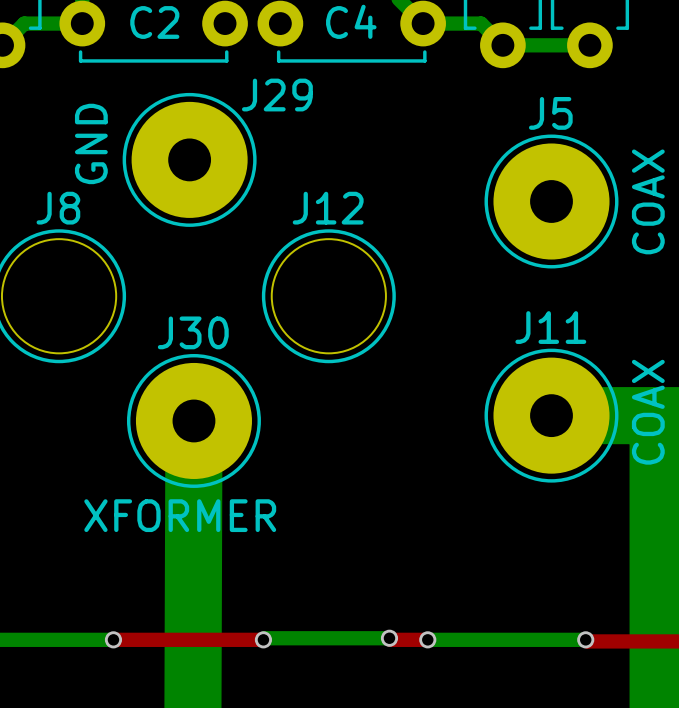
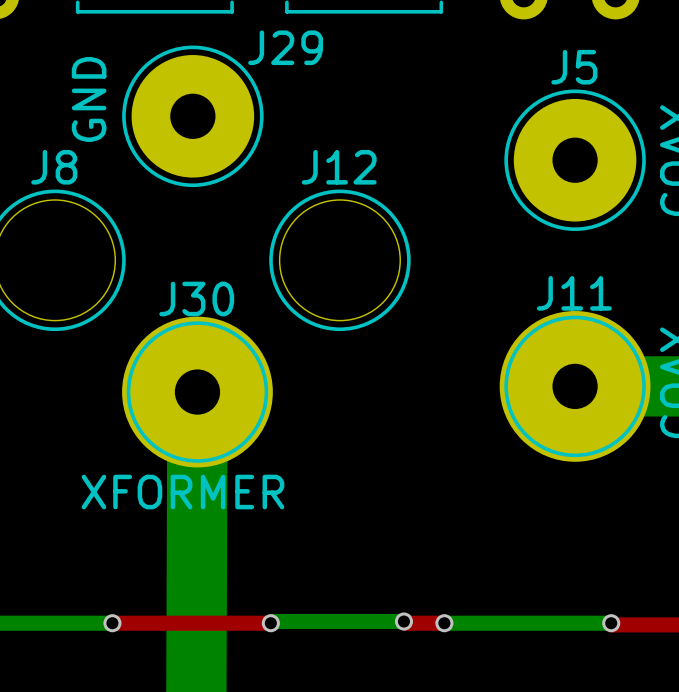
J11 footprint: [484, 348, 619, 483] -> [499, 311, 651, 462]
J30 footprint: [126, 353, 261, 488] -> [122, 316, 273, 468]

